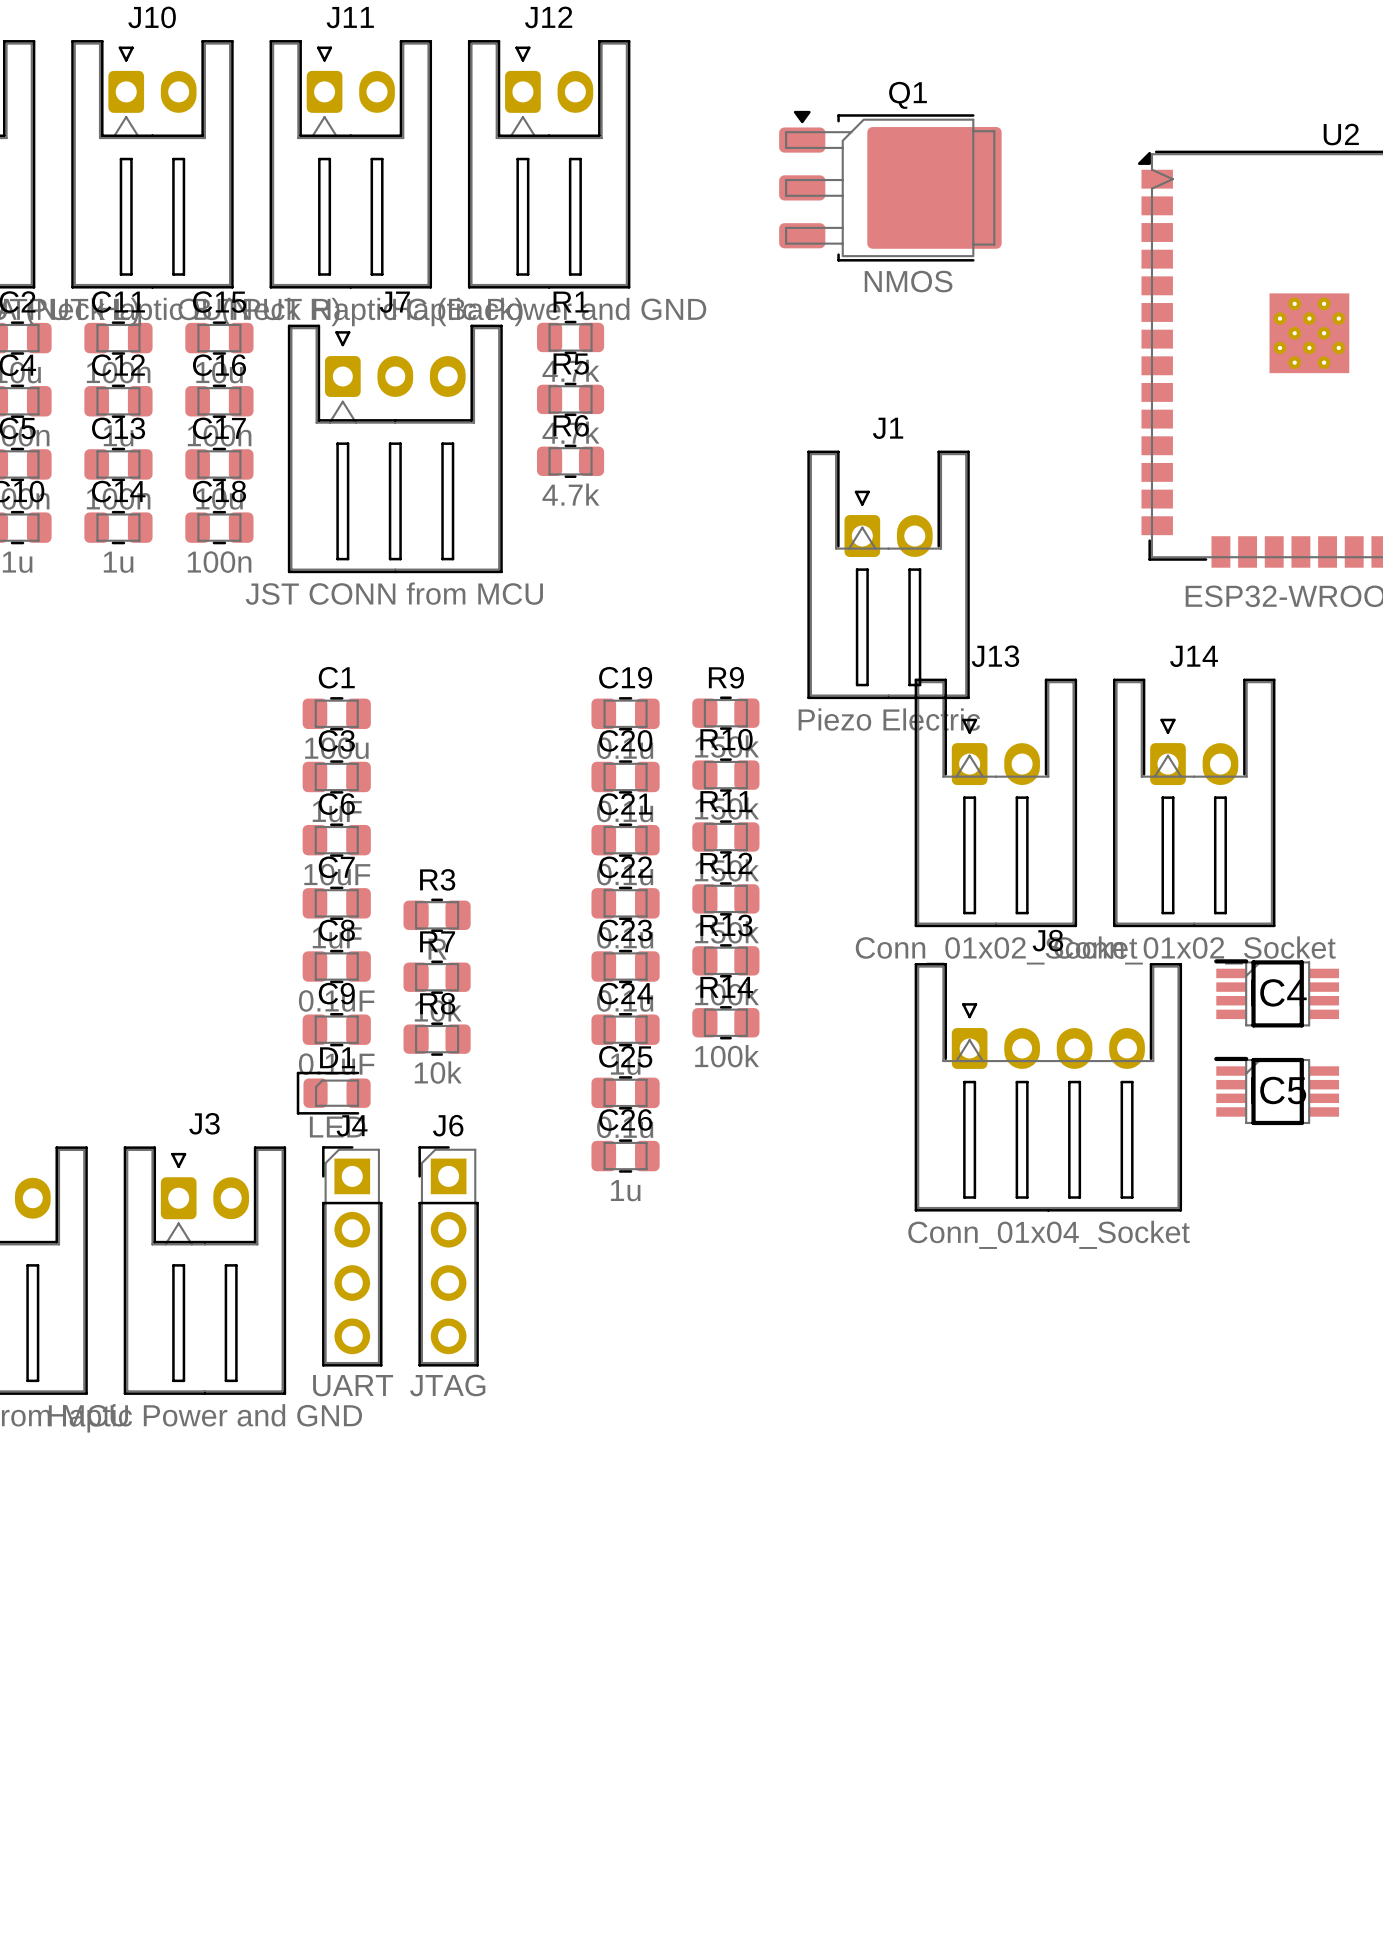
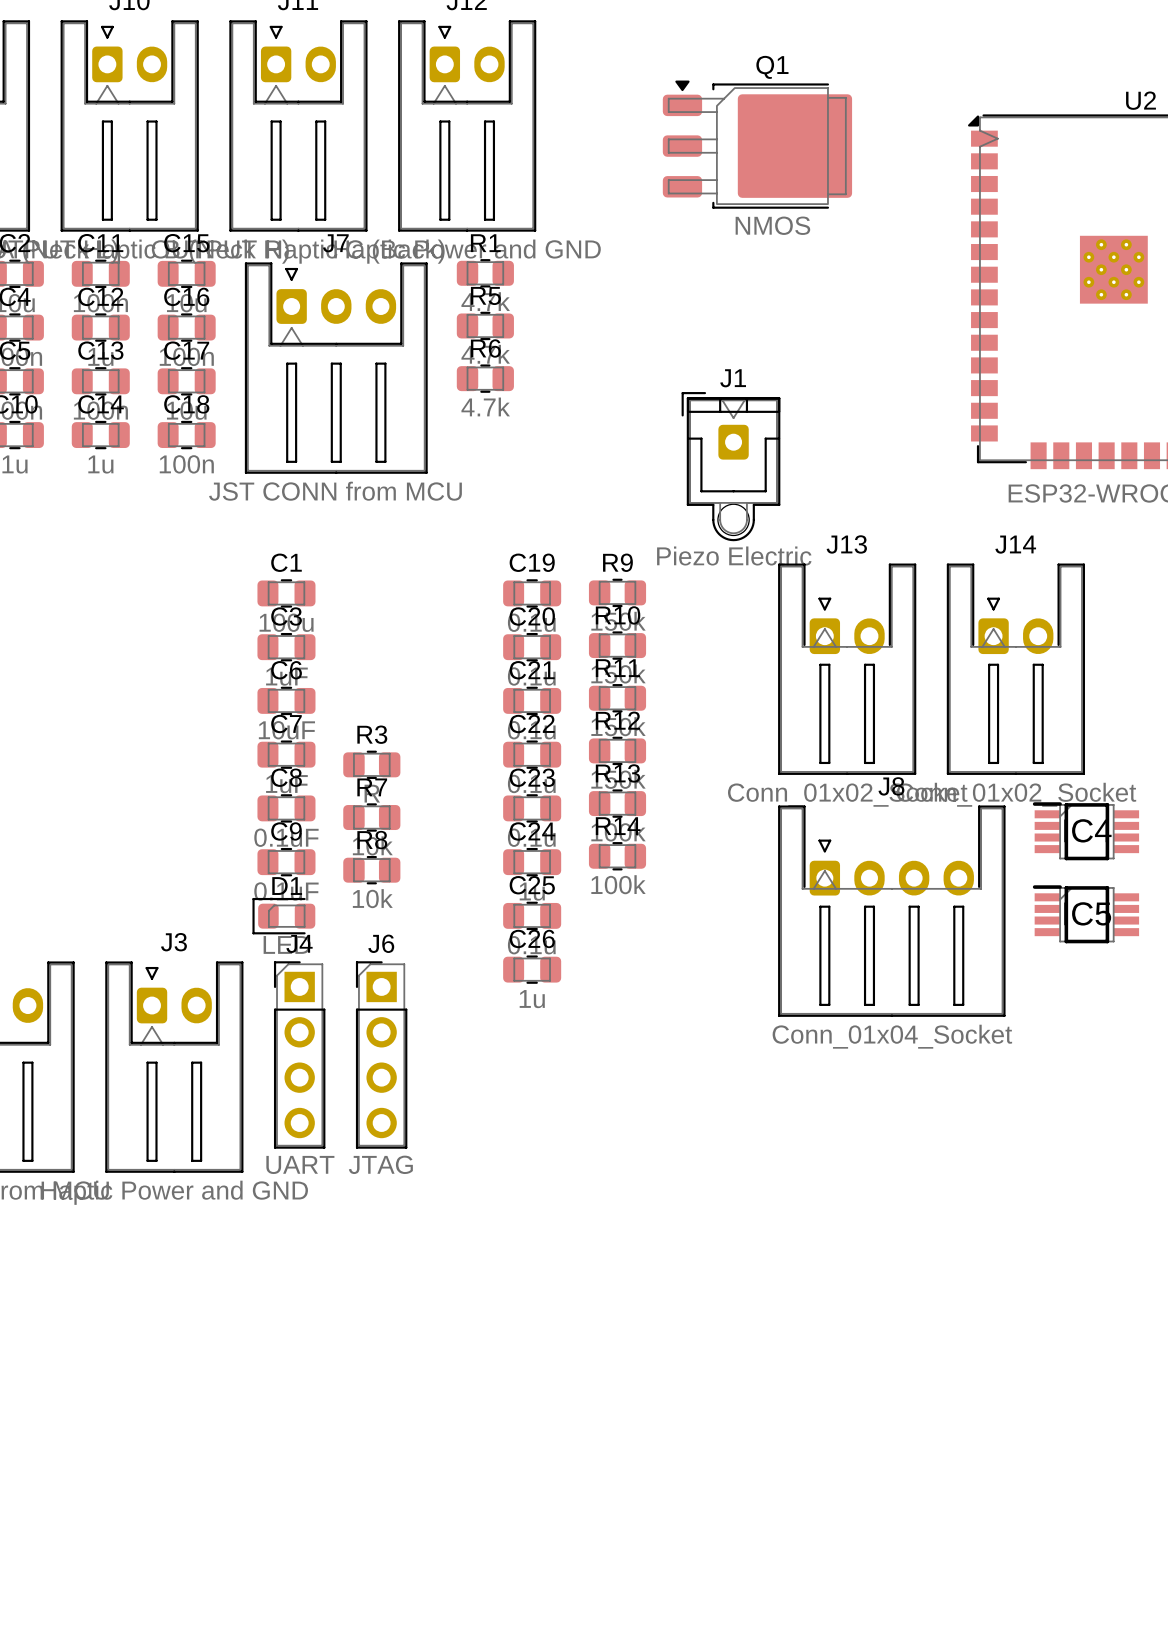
J1 name position: J1 (888, 428) -> J1 (733, 378)
J1 footprint: [807, 450, 970, 700] -> [681, 392, 781, 542]

